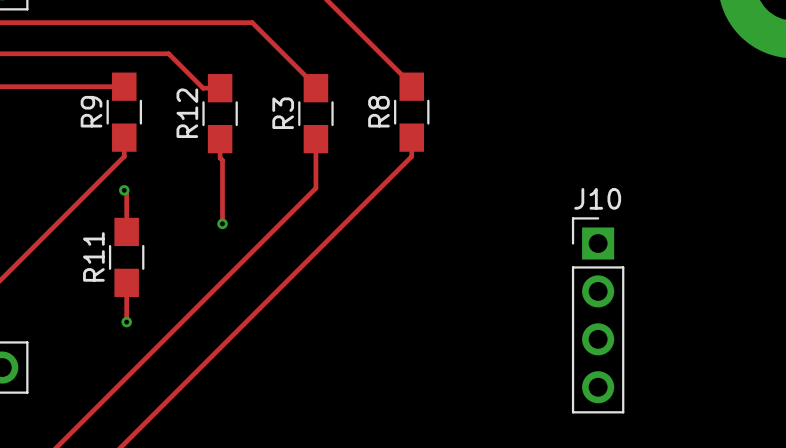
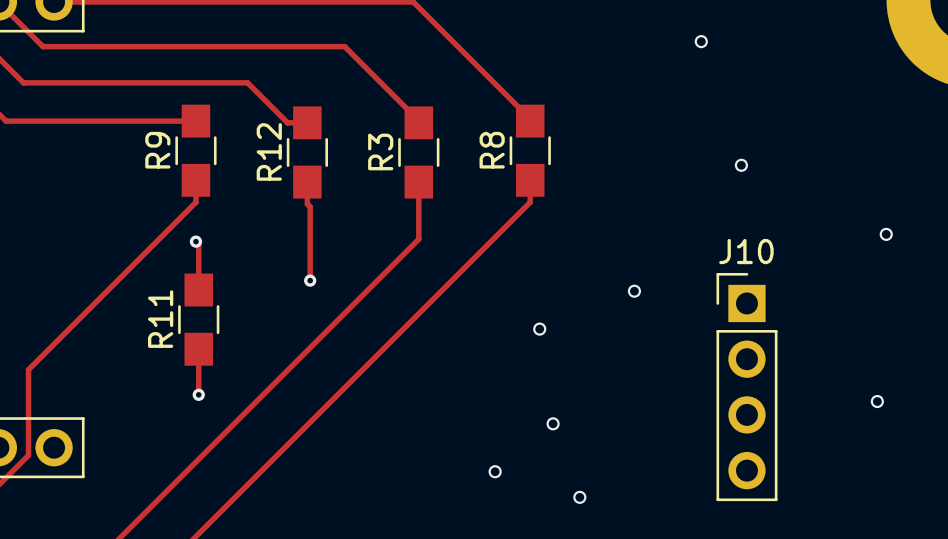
via: none -> (701, 41)
via: none -> (741, 165)
via: none -> (886, 234)
via: none -> (634, 291)
via: none -> (539, 329)
via: none -> (877, 401)
via: none -> (553, 423)
via: none -> (495, 471)
via: none -> (579, 497)

